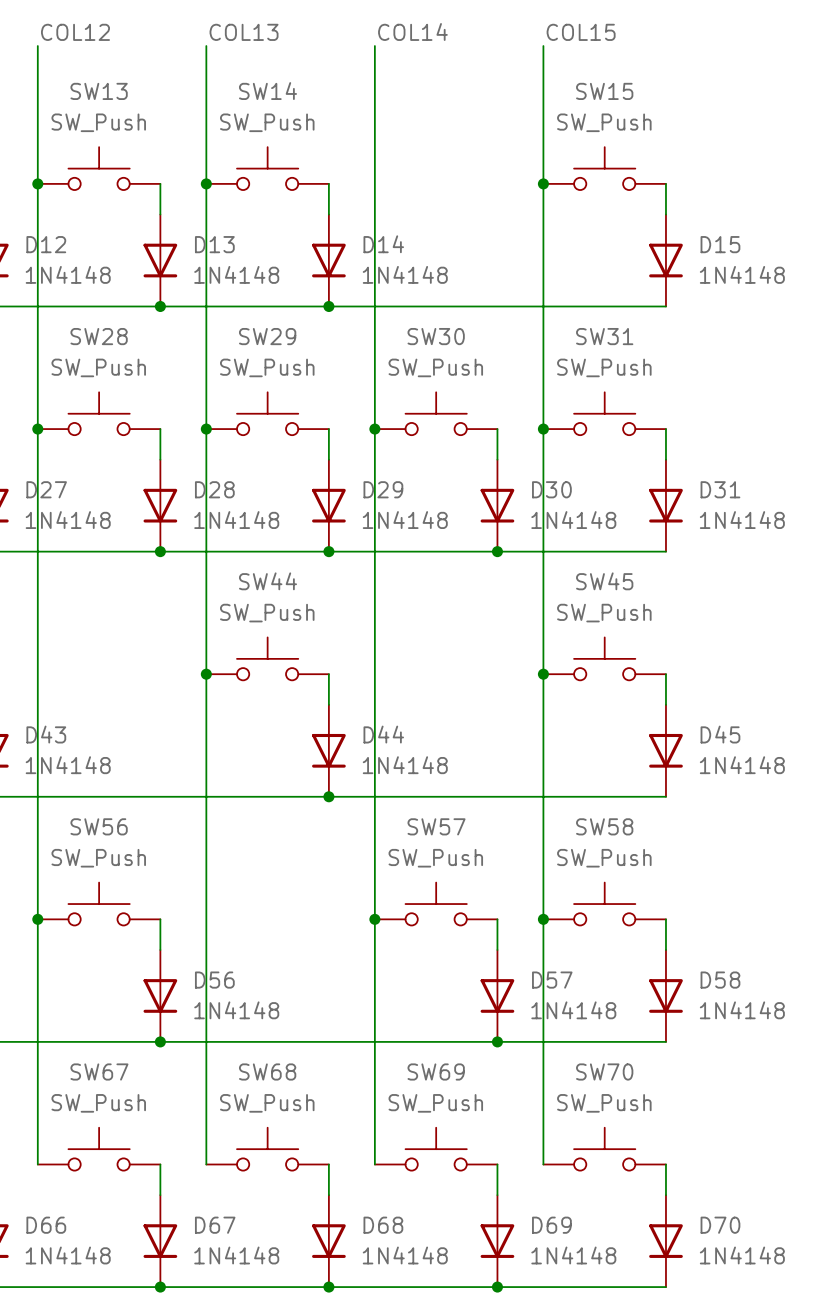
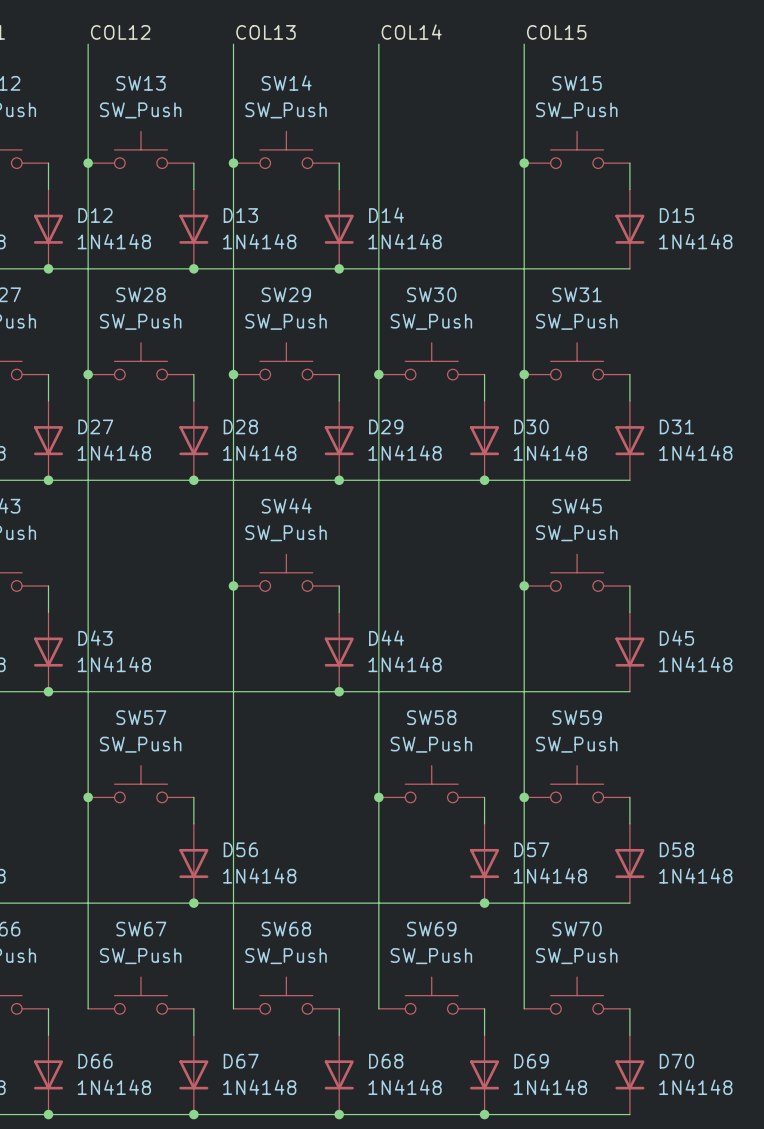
SW56 name: SW56 (99, 826) -> SW57 (141, 717)
SW57 name: SW57 (436, 826) -> SW58 (431, 717)
SW58 name: SW58 (604, 826) -> SW59 (577, 717)

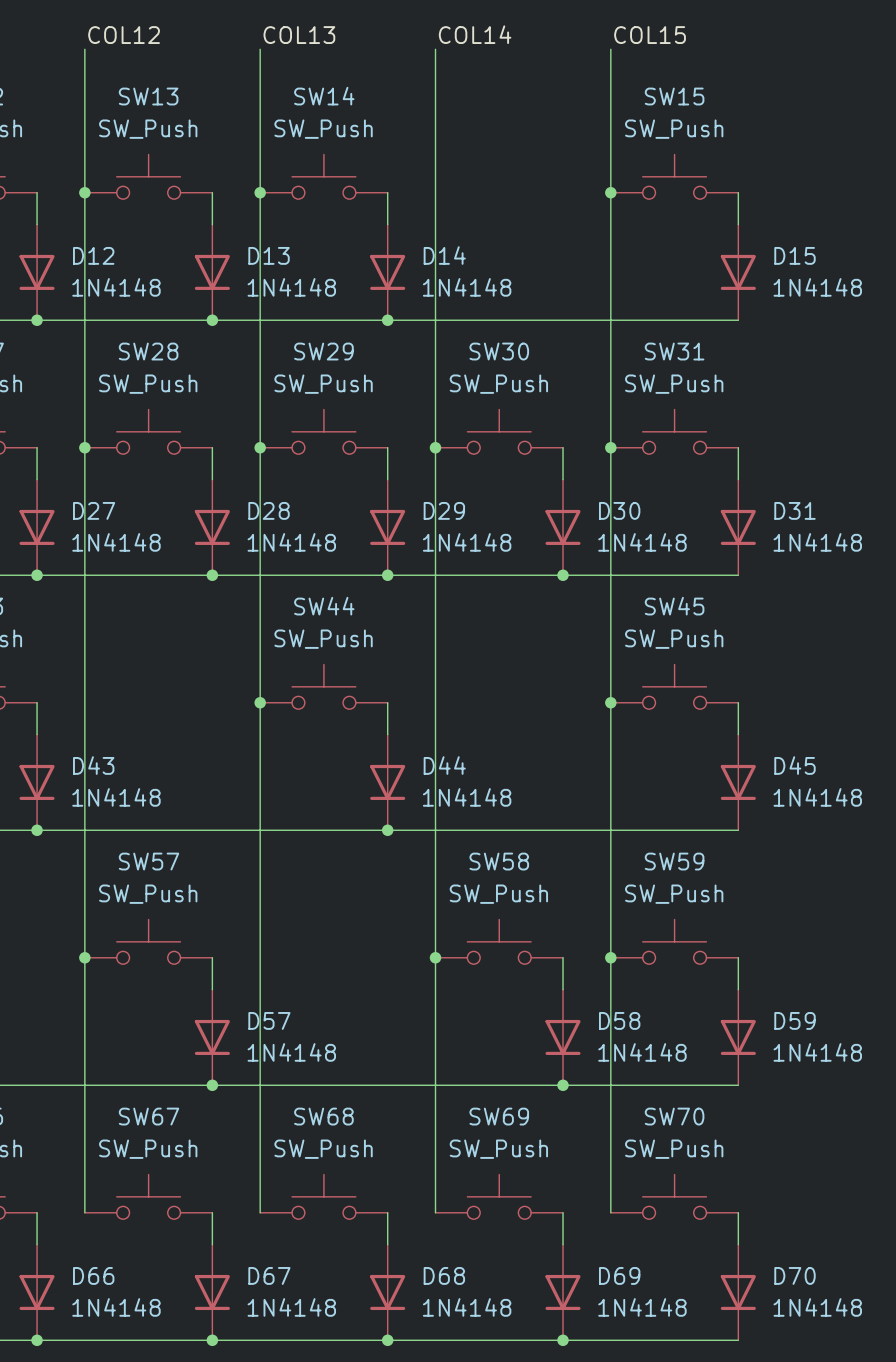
D56 name: D56 (240, 849) -> D57 (269, 1020)
D57 name: D57 (531, 849) -> D58 (619, 1020)
D58 name: D58 (676, 849) -> D59 (794, 1020)

